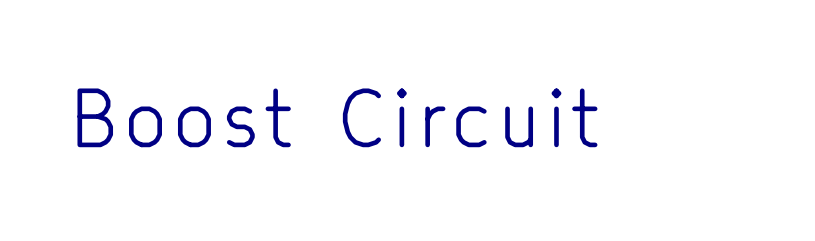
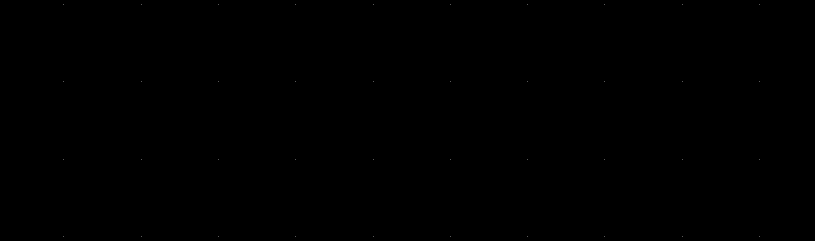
text: Boost Circuit (337, 117) -> none

